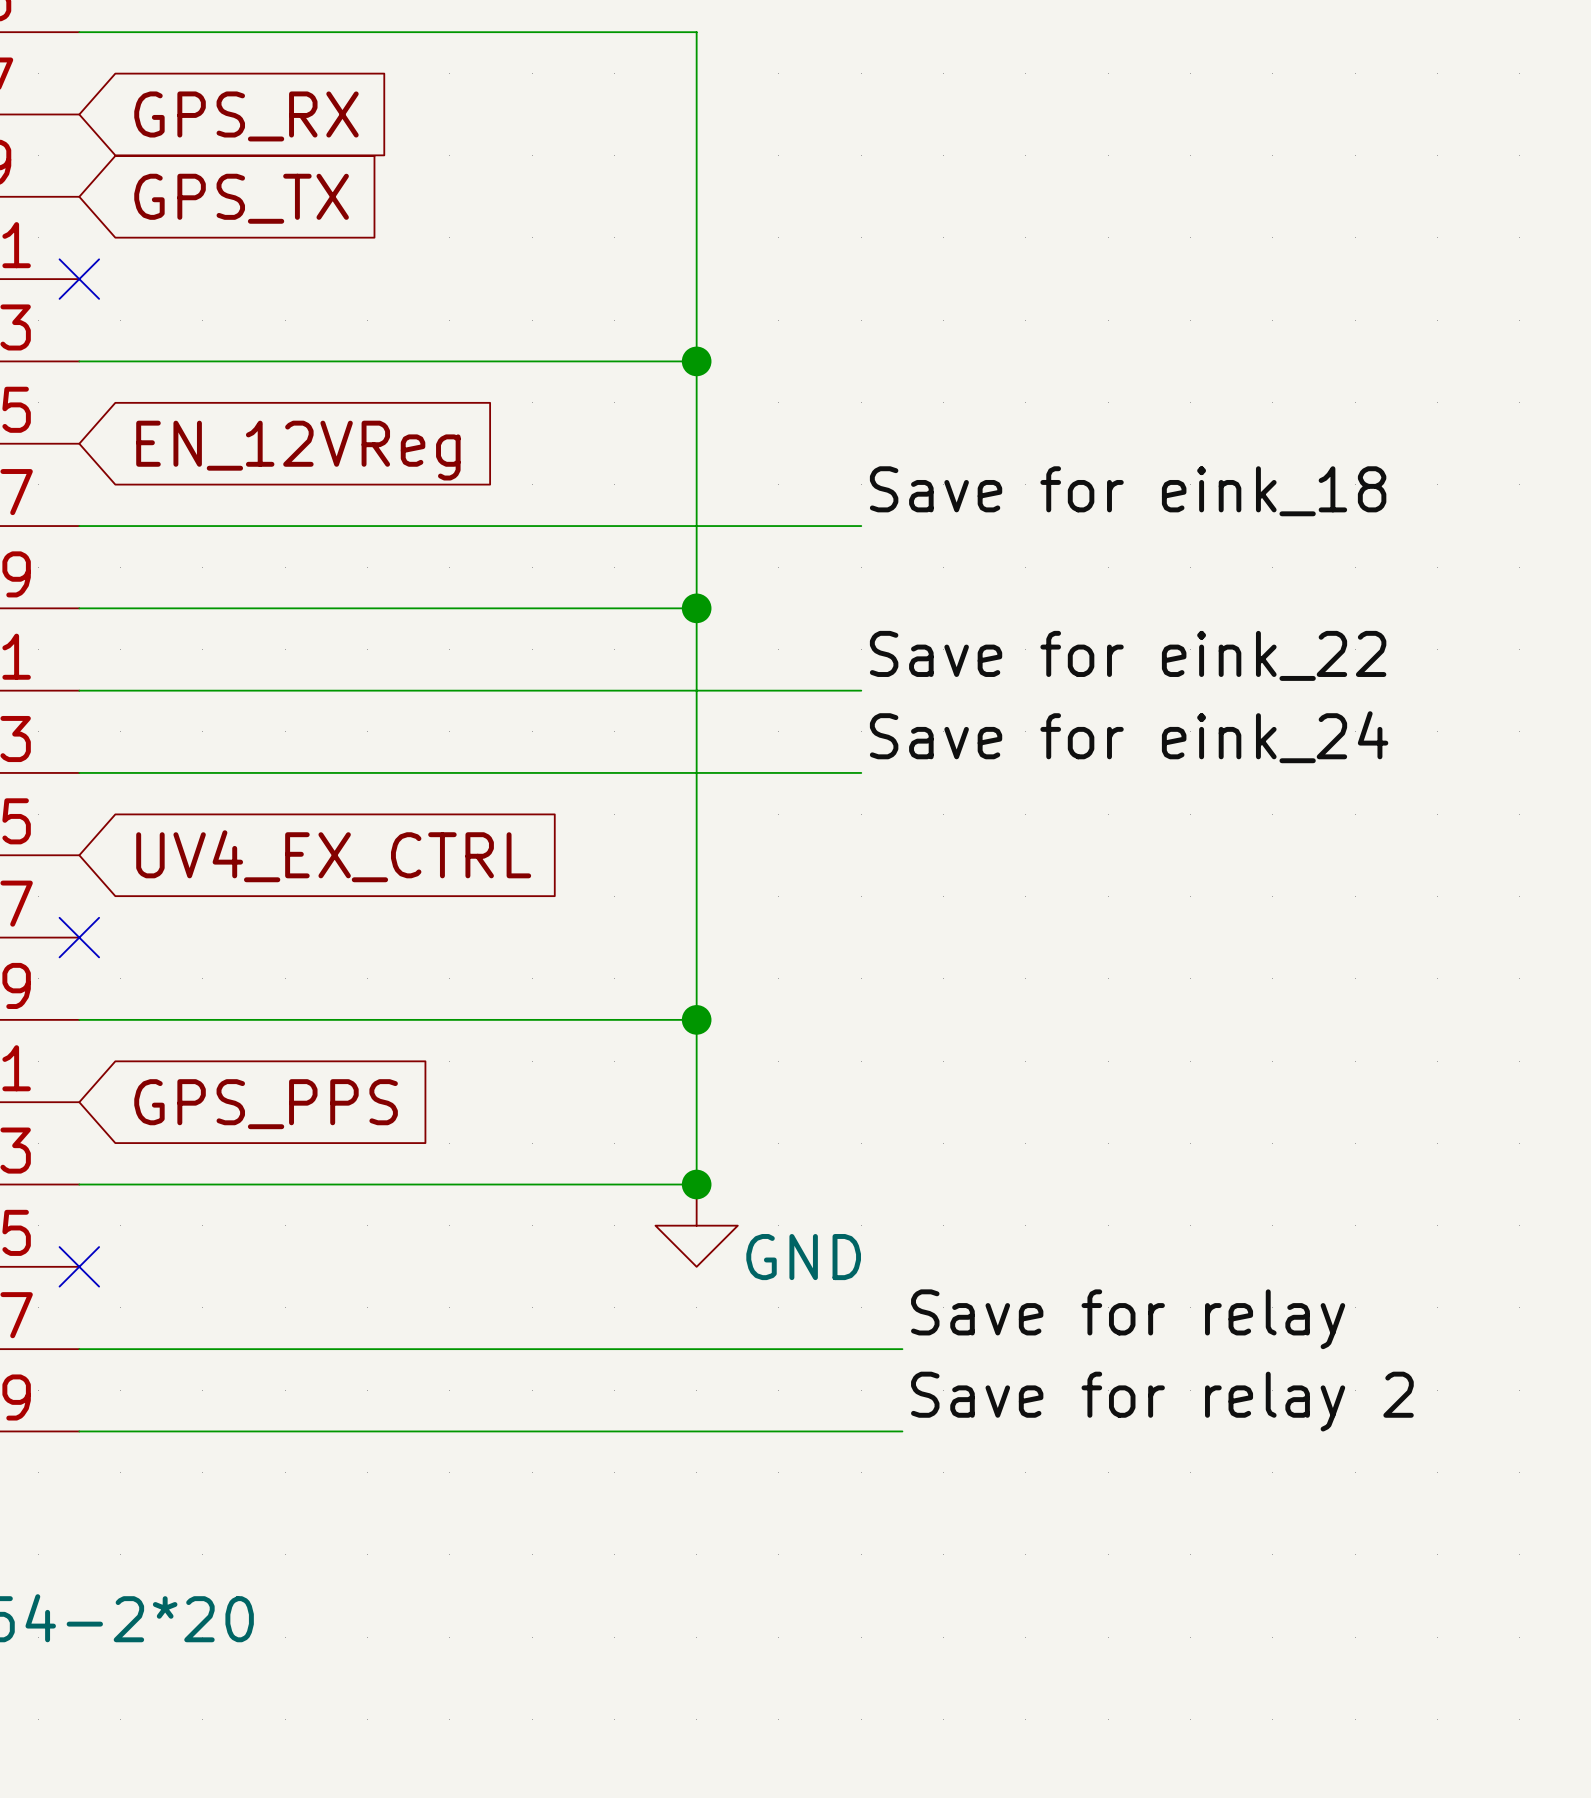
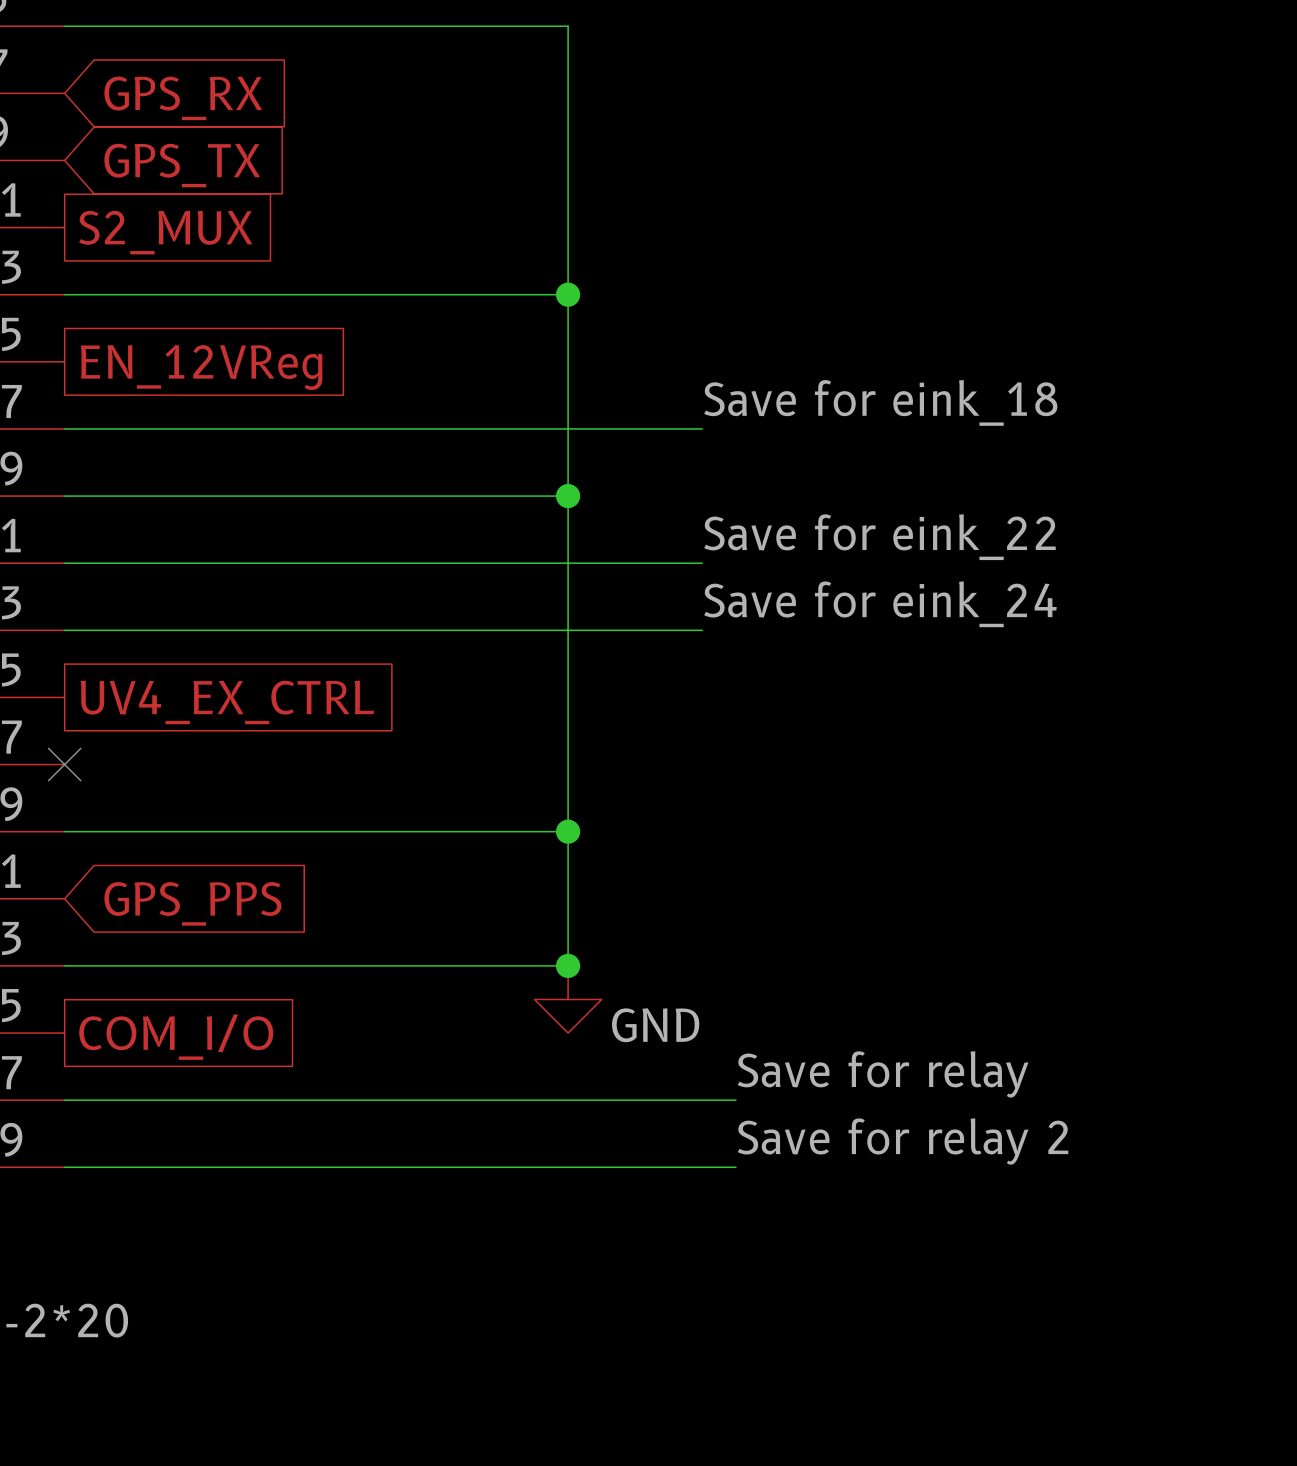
no-connect mark: (79, 279) -> none
global label: none -> S2_MUX (165, 232)
global label shape: input (298, 450) -> passive (201, 367)
global label shape: input (333, 856) -> passive (227, 702)
no-connect mark: (79, 1266) -> none
global label: none -> COM_I/O (176, 1037)

